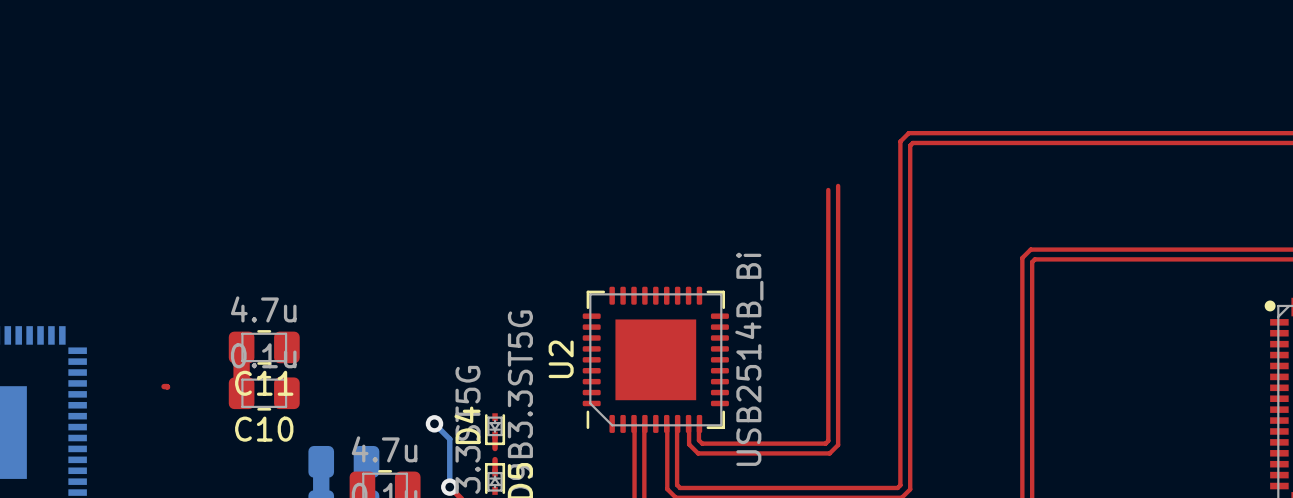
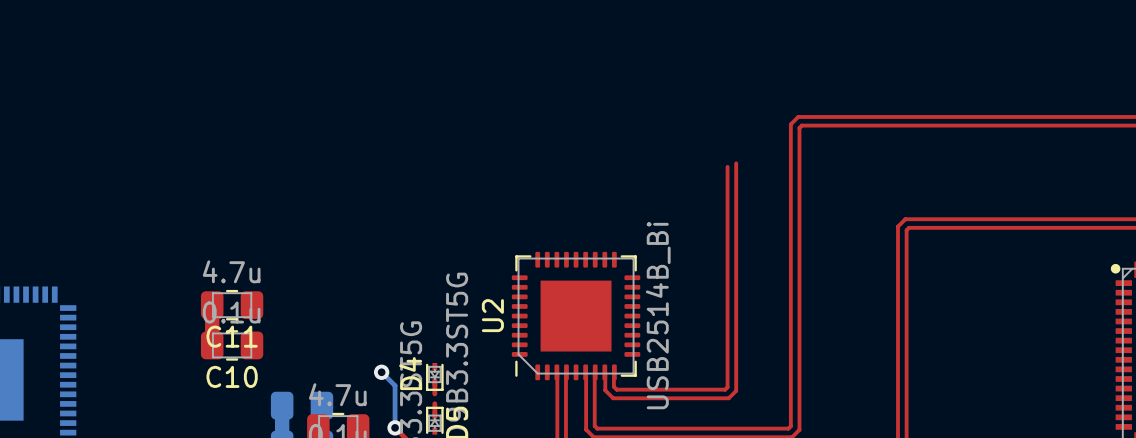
top track: (164, 386) (167, 387) -> none

